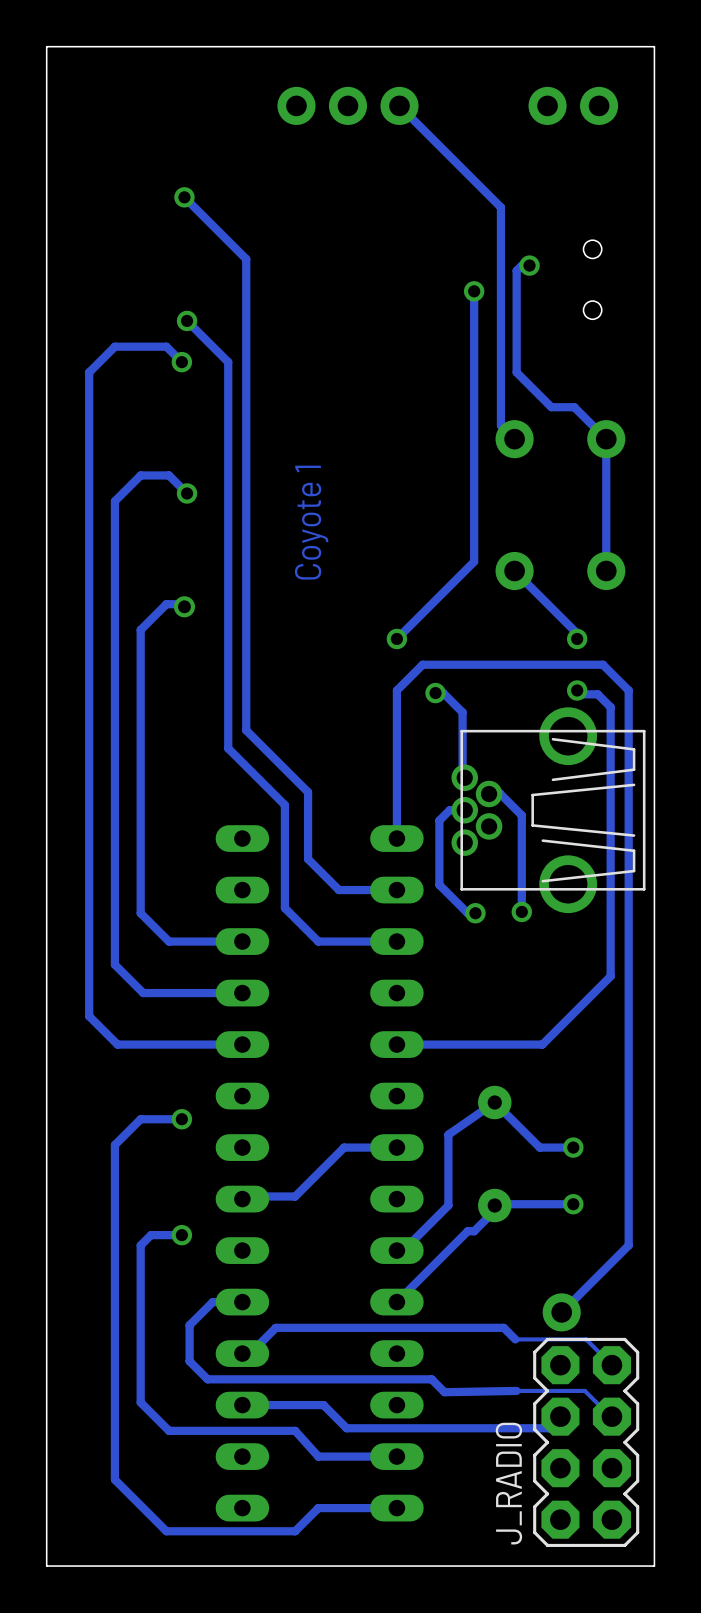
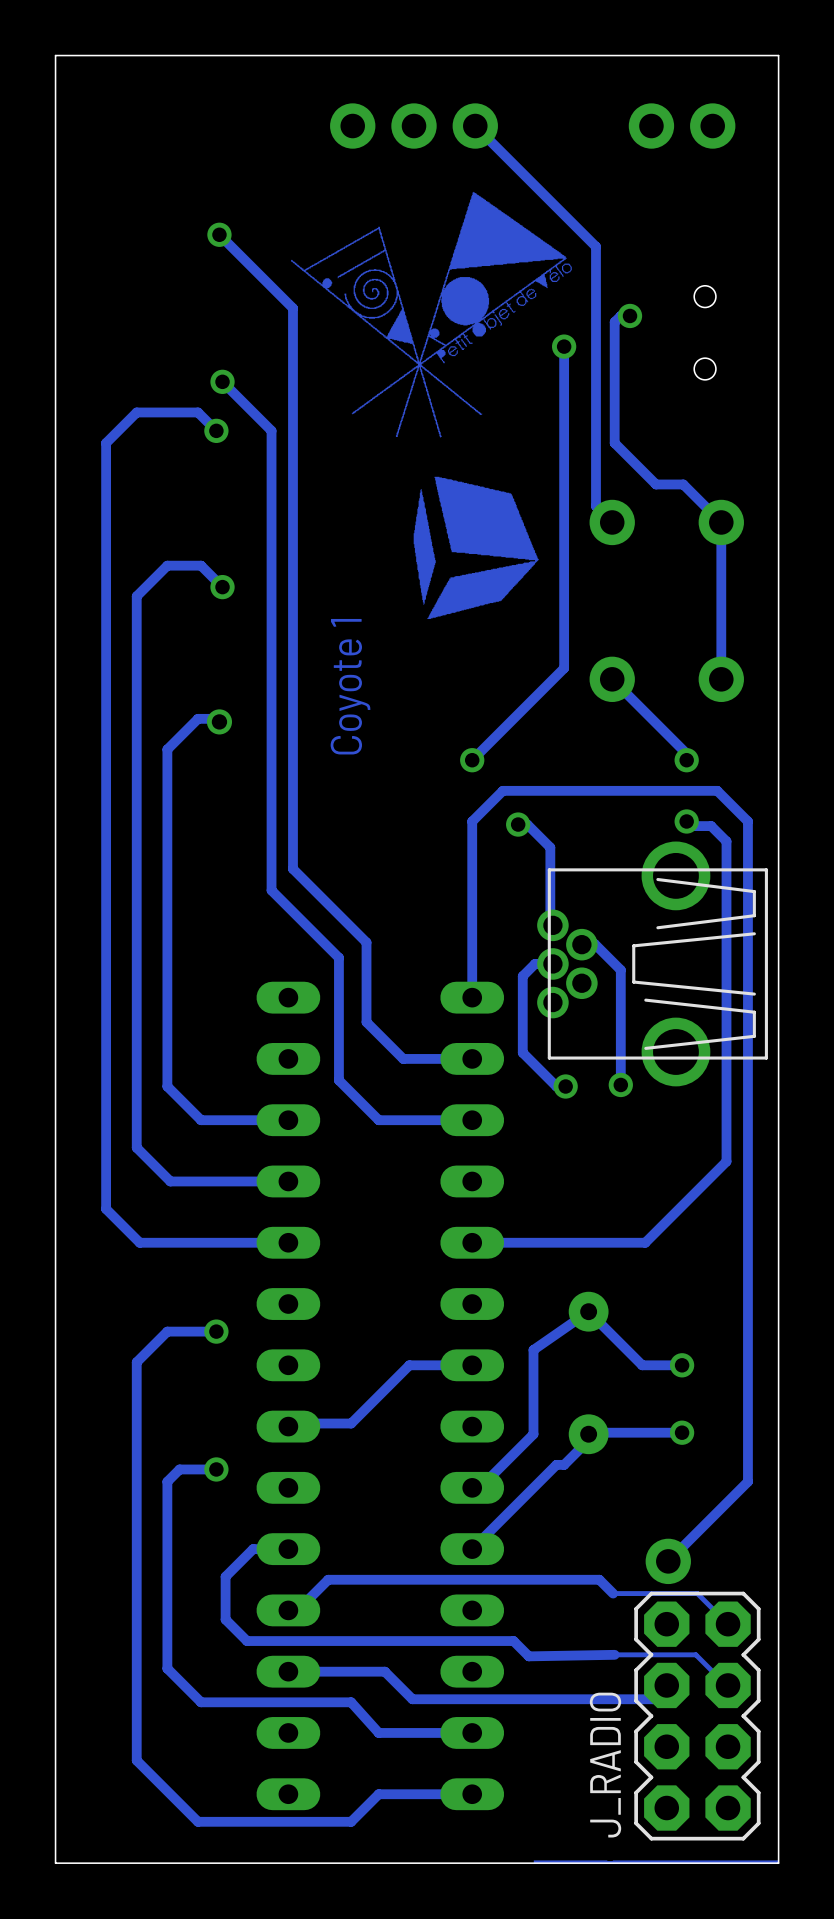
drawing: none -> [291, 191, 572, 438]
drawing: none -> [413, 476, 539, 619]
text position: Coyote 1 (311, 522) -> Coyote 1 (350, 686)
drawing: none -> [533, 1860, 779, 1864]

